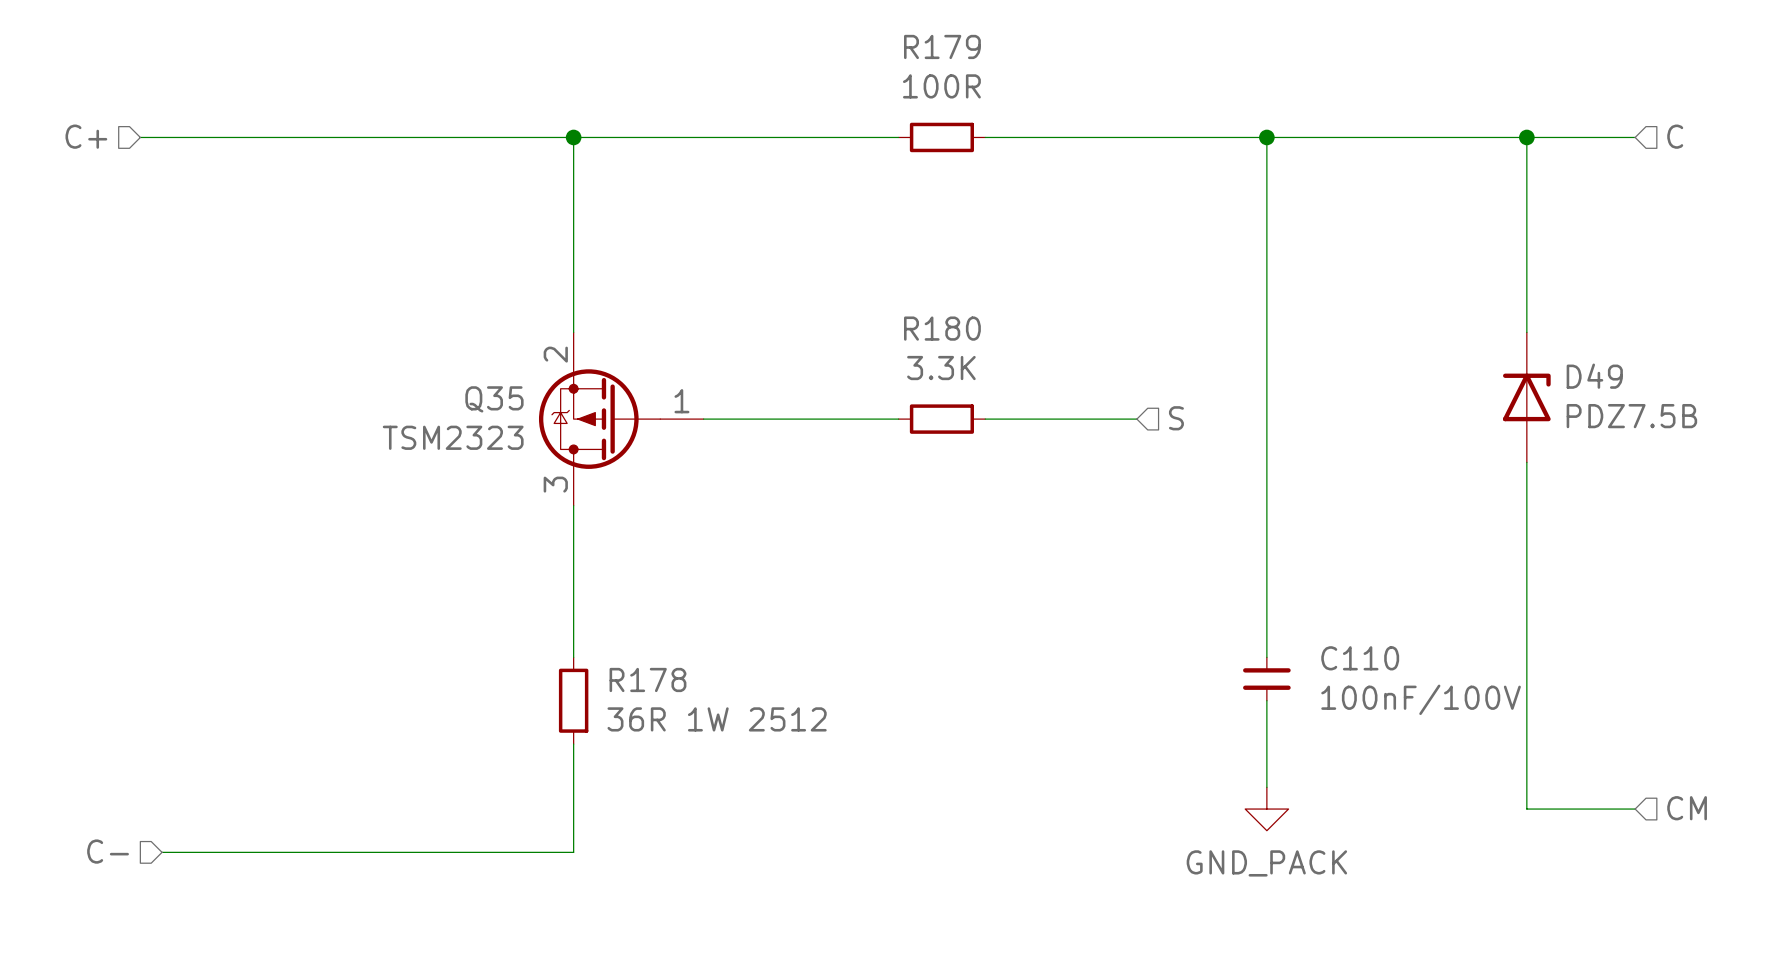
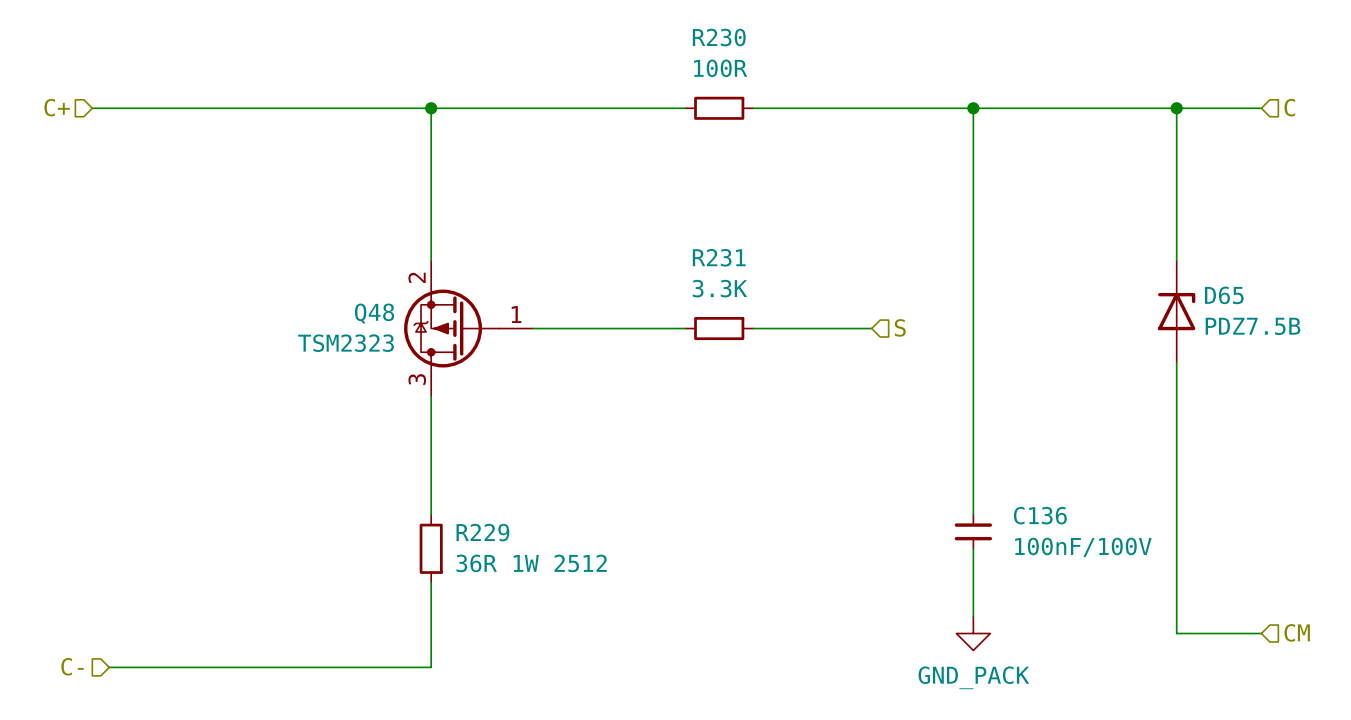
R179 name: R179 (942, 46) -> R230 (719, 37)
R180 name: R180 (942, 328) -> R231 (719, 257)
D49 name: D49 (1594, 376) -> D65 (1224, 295)
Q35 name: Q35 (494, 399) -> Q48 (374, 313)
C110 name: C110 (1360, 658) -> C136 (1040, 515)
R178 name: R178 (647, 679) -> R229 (482, 532)

